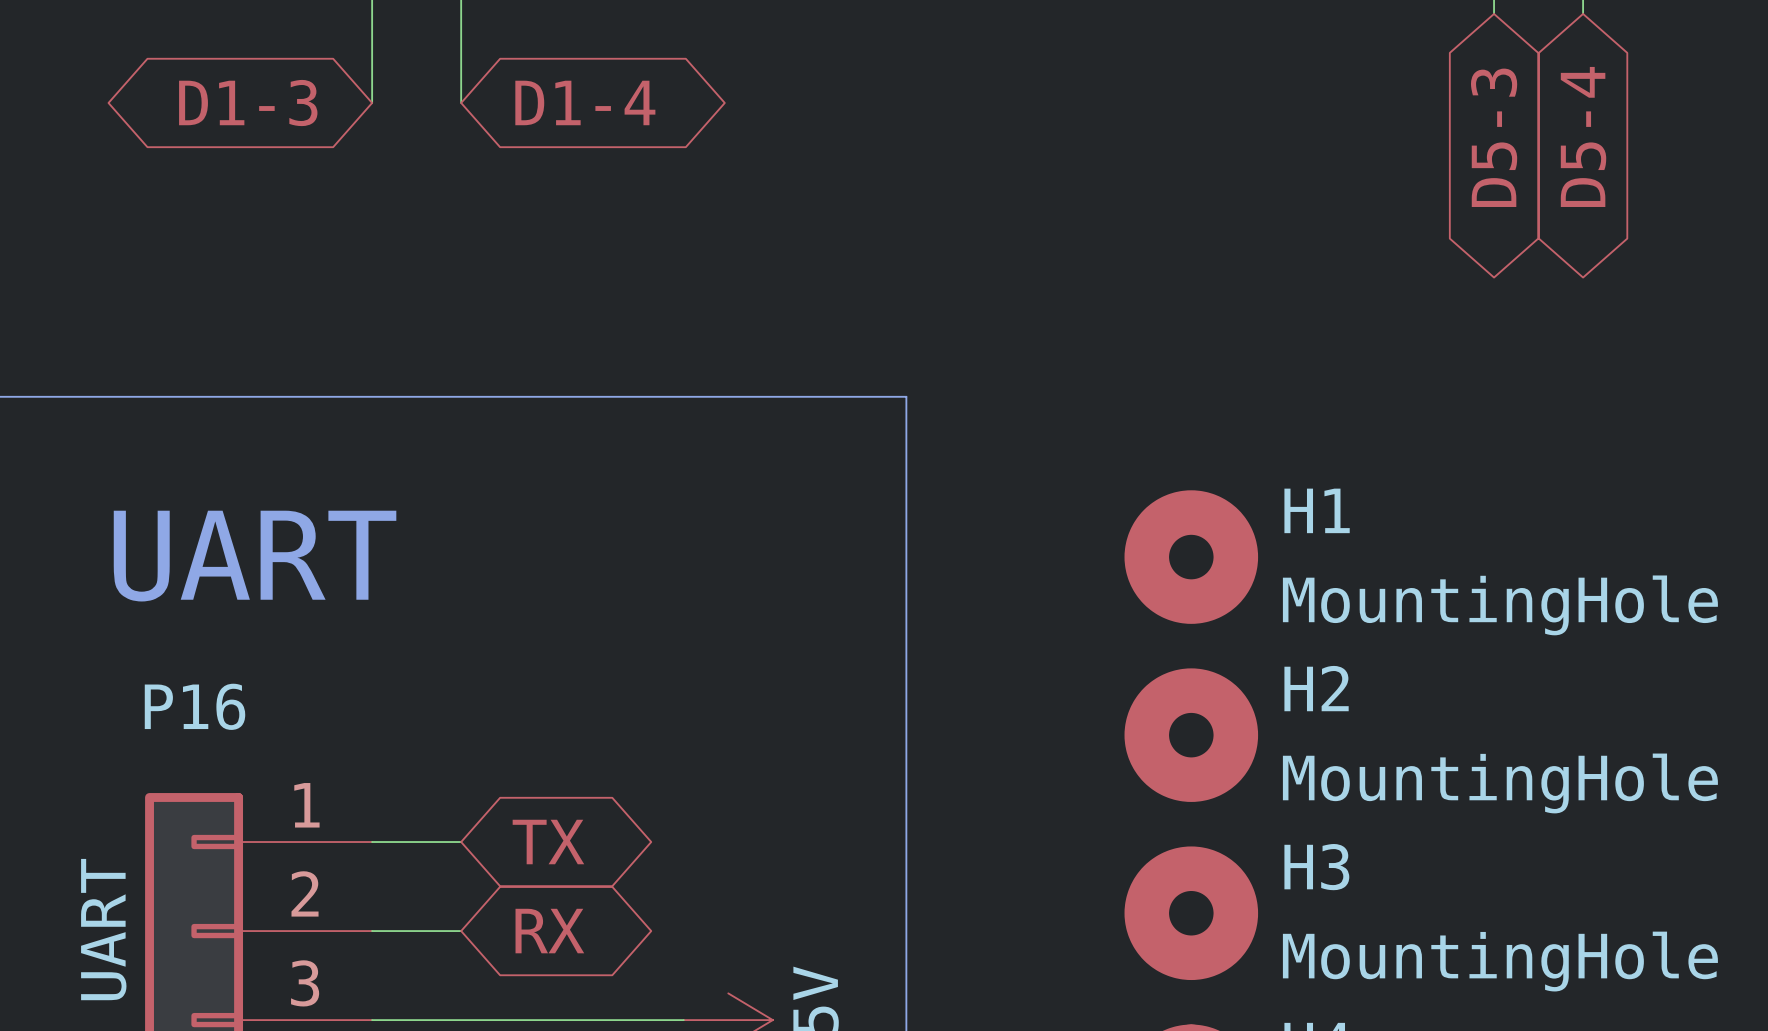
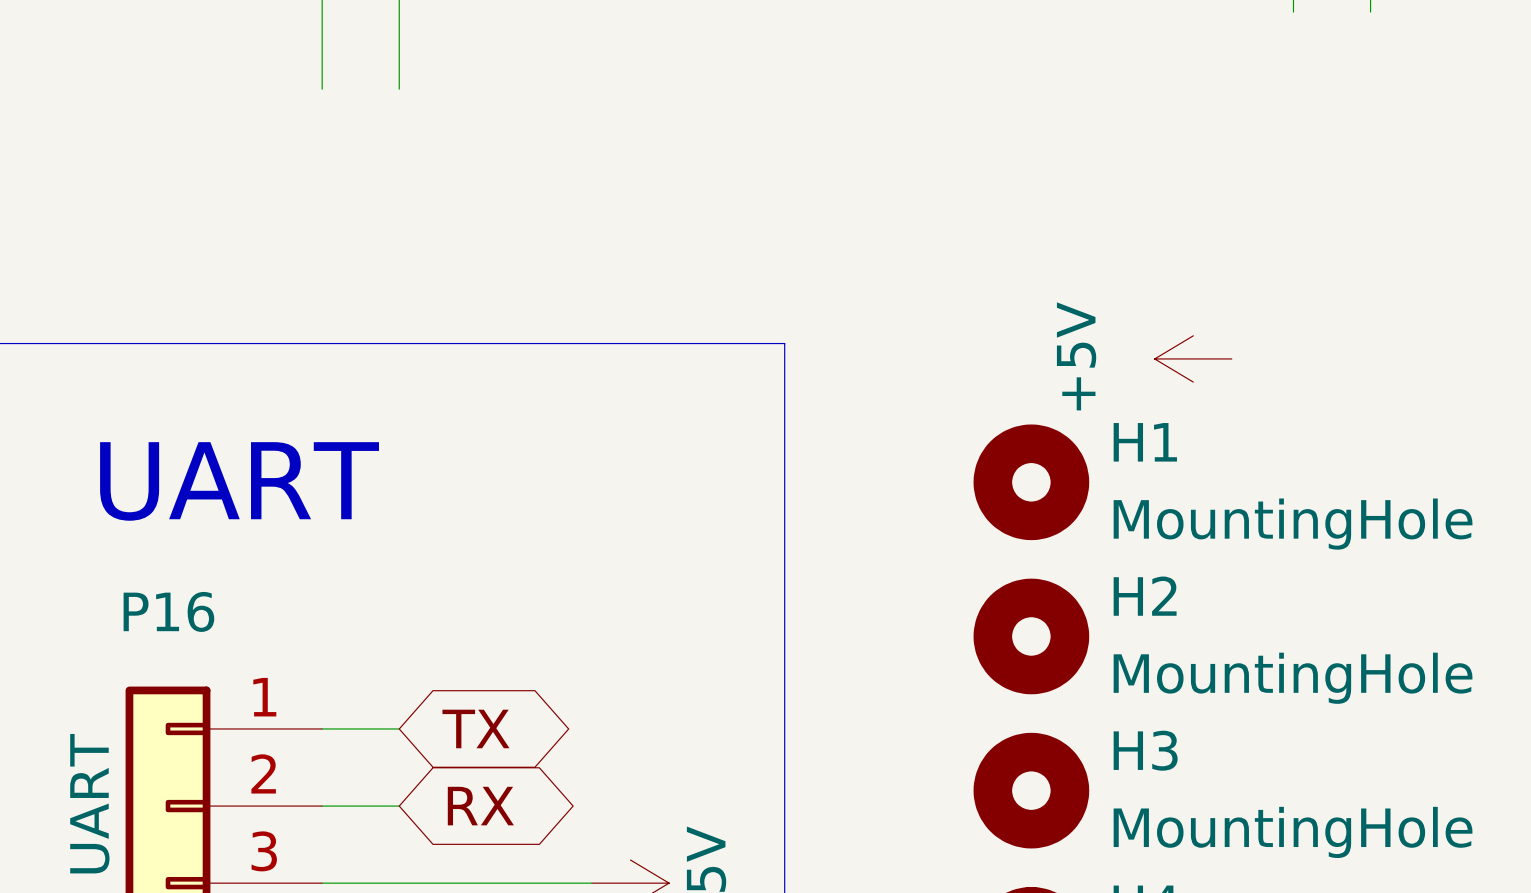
global label: D1-4 (585, 102) -> none
global label: D1-3 (248, 103) -> none
global label: D5-4 (1583, 136) -> none
global label: D5-3 (1494, 137) -> none
power symbol: none -> +5V (1193, 358)

